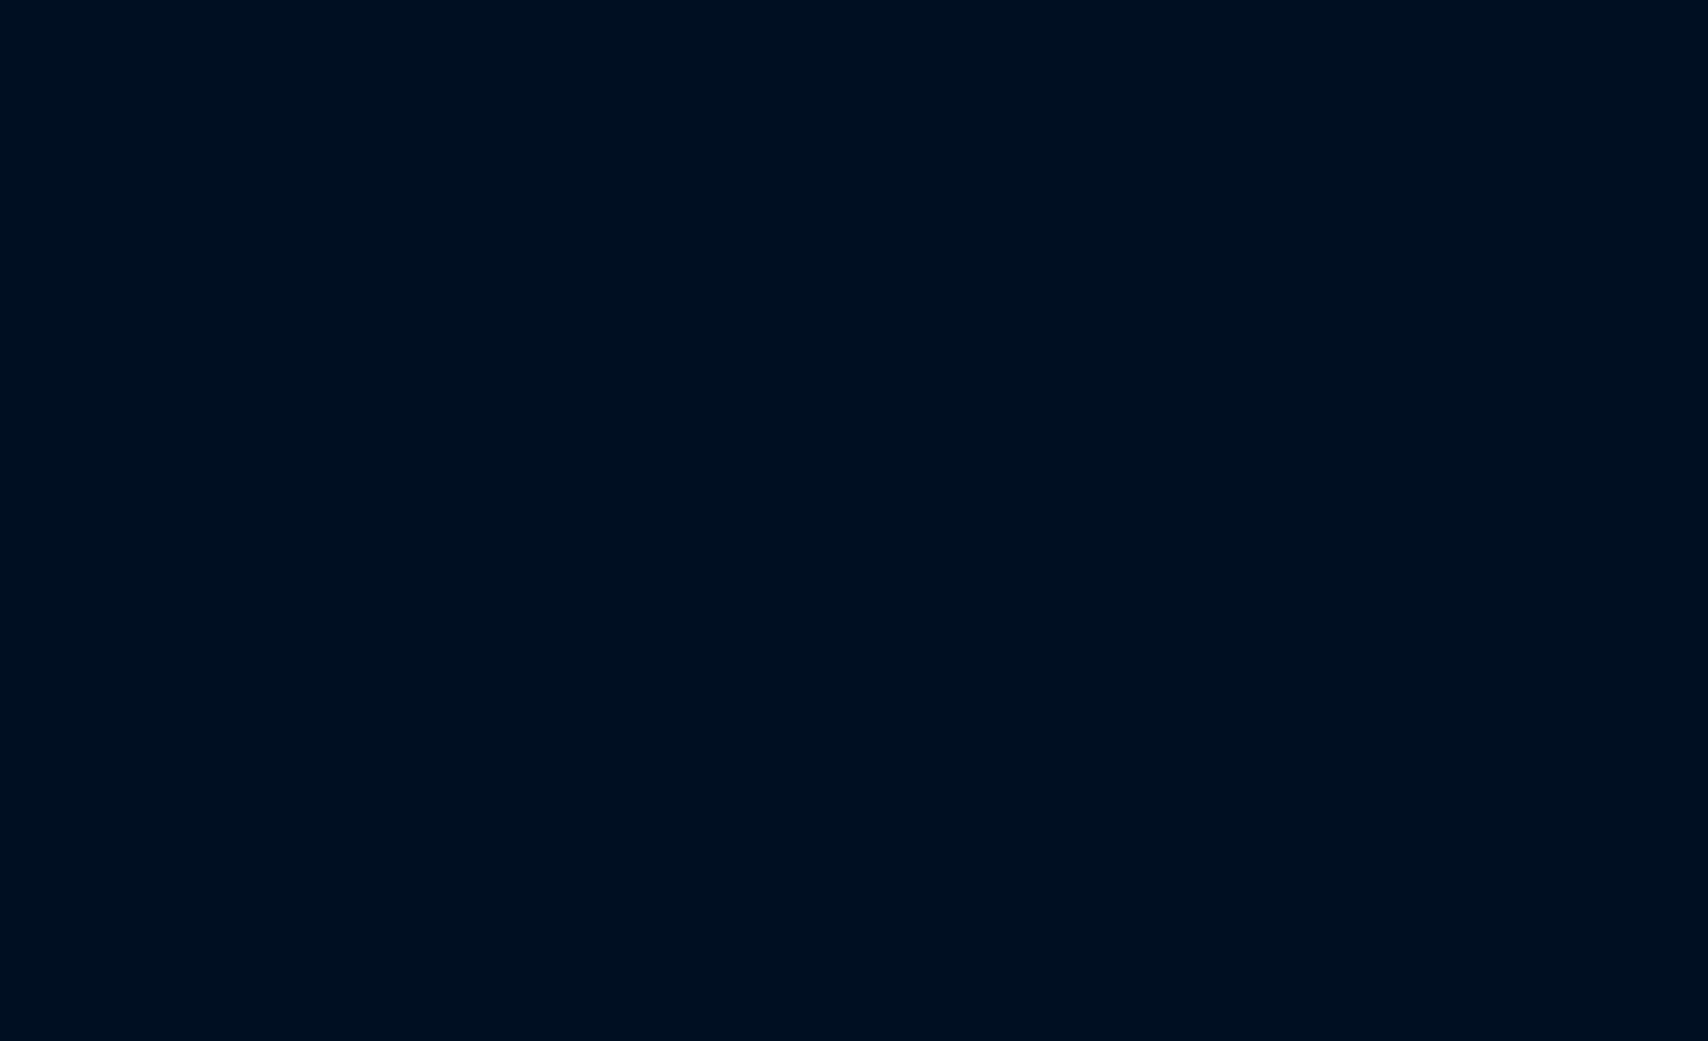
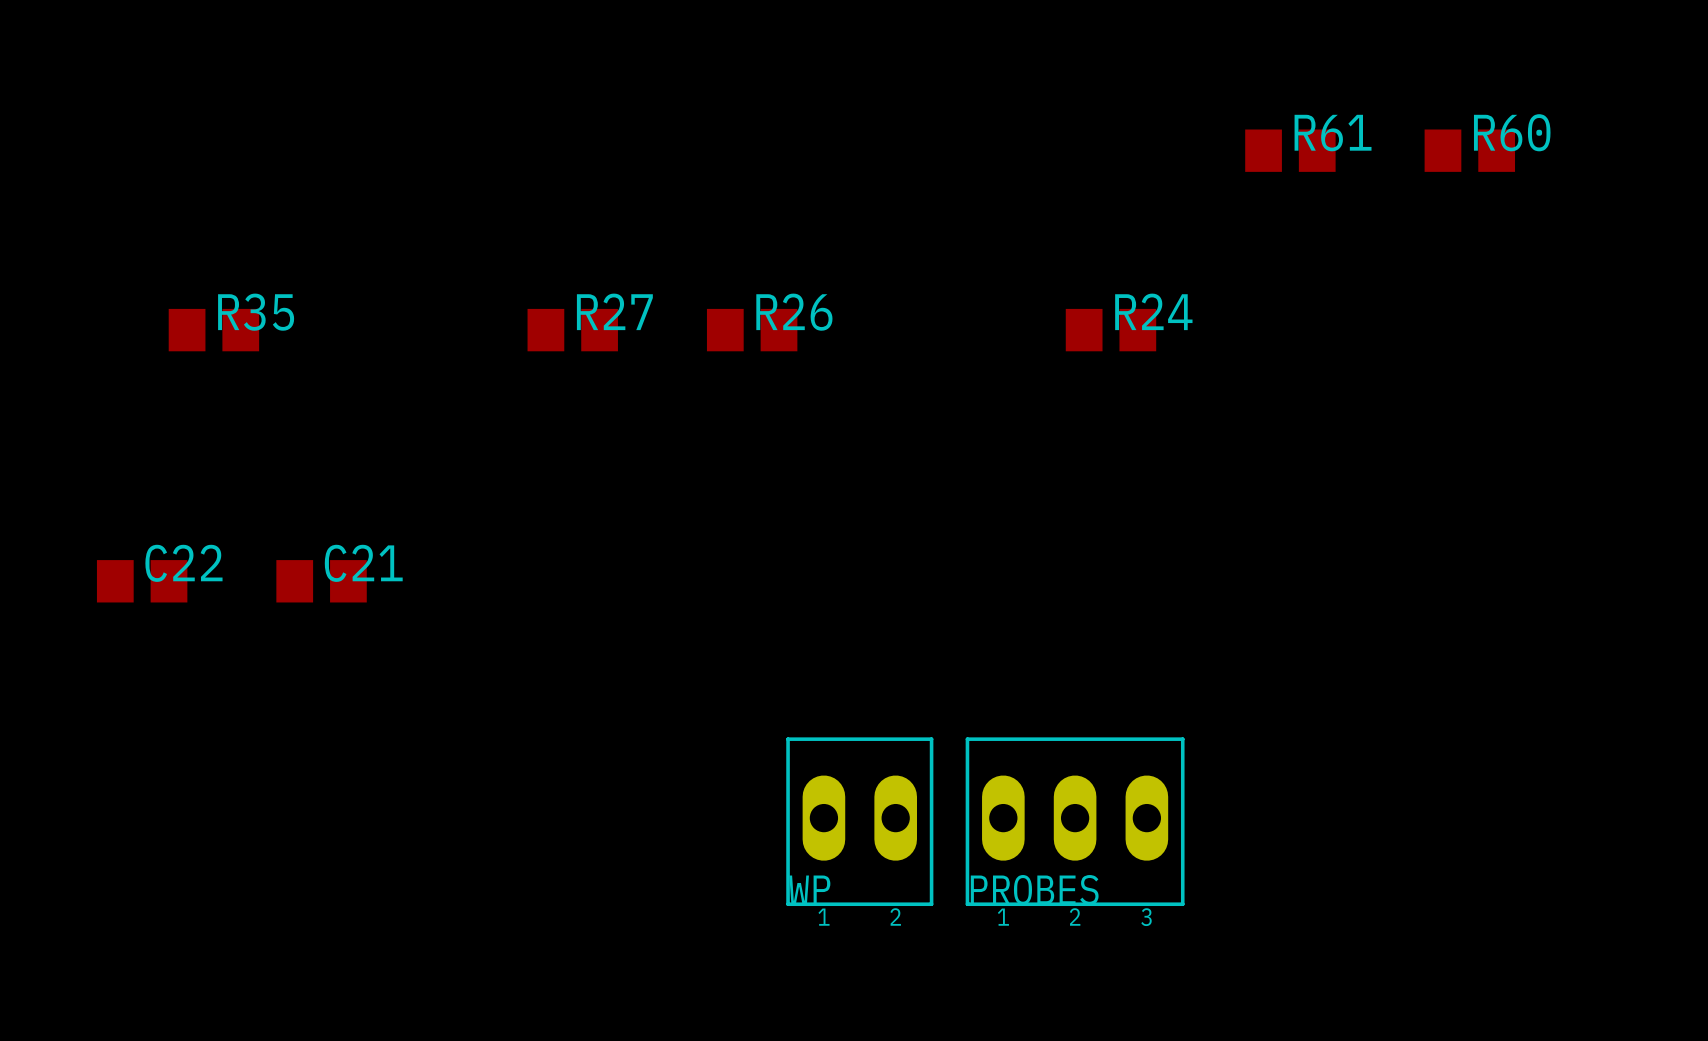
R61: none -> (1290, 150)
R60: none -> (1469, 150)
R35: none -> (213, 330)
R27: none -> (572, 330)
R26: none -> (752, 330)
R24: none -> (1110, 330)
C22: none -> (142, 581)
C21: none -> (321, 581)
WP: none -> (859, 821)
PROBES: none -> (1075, 821)

